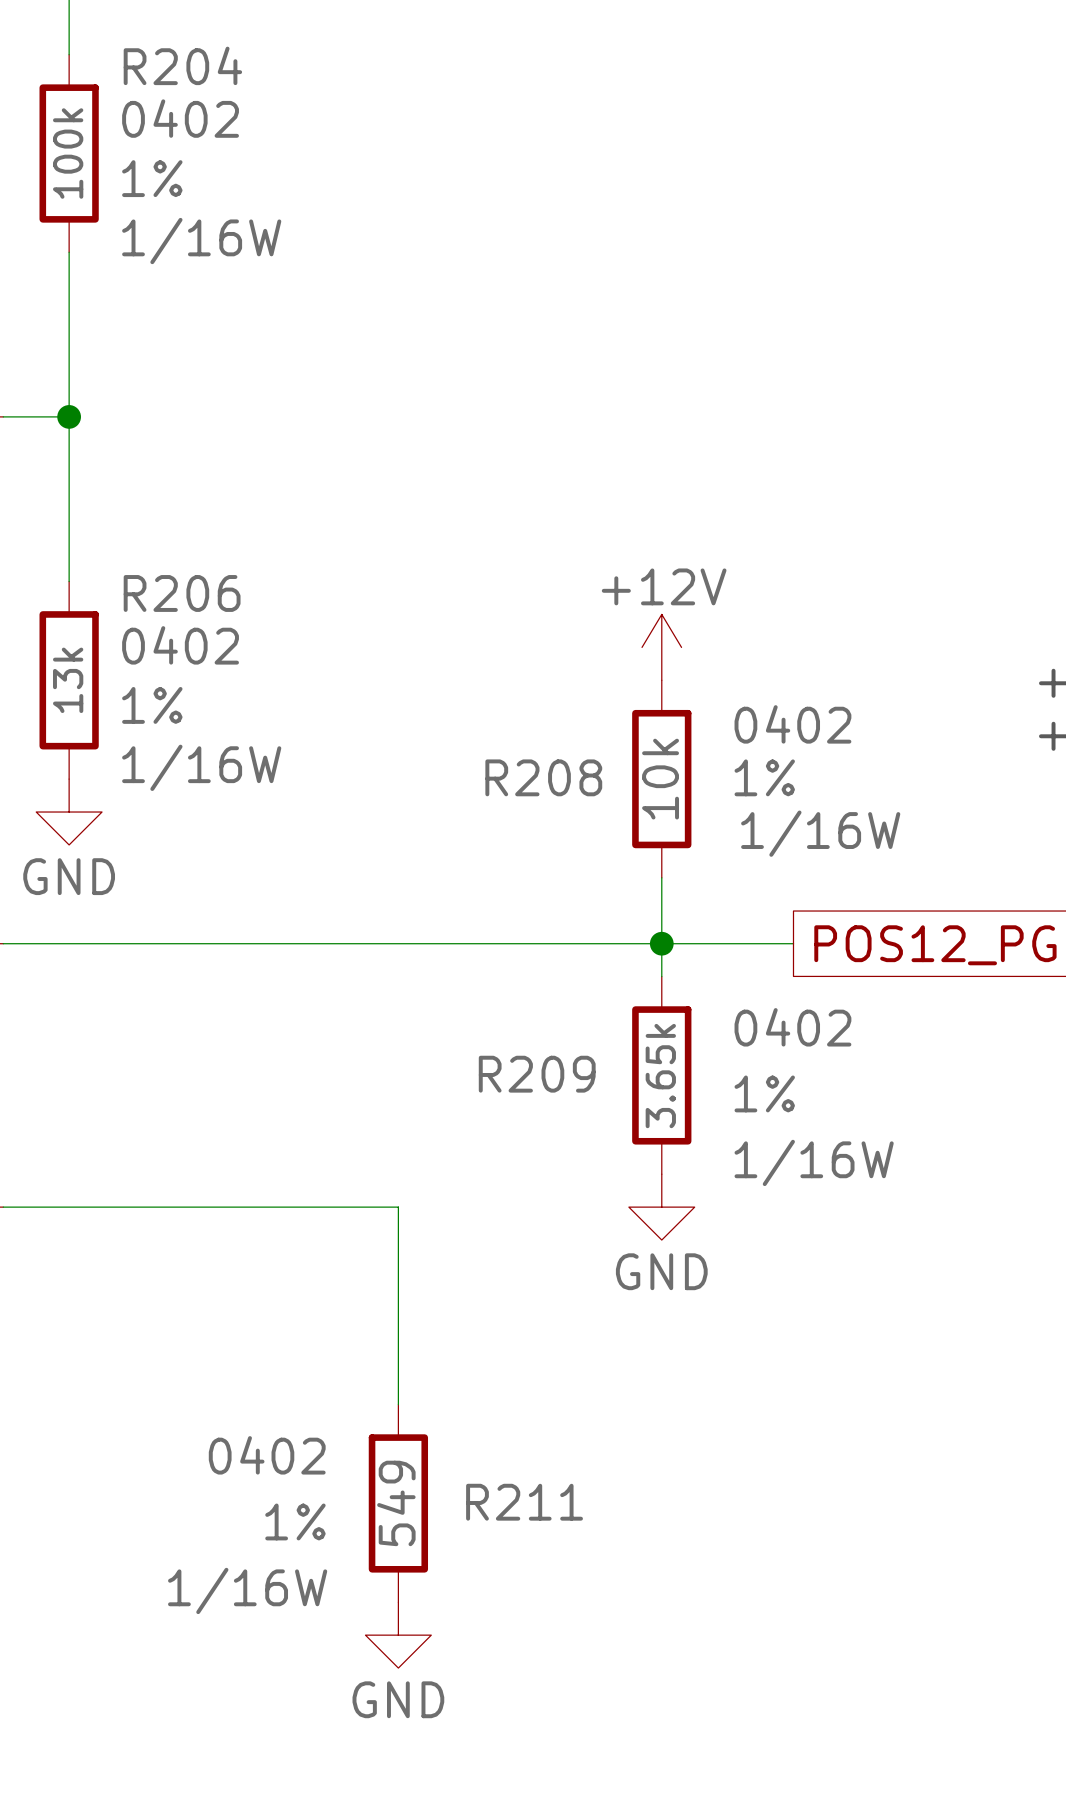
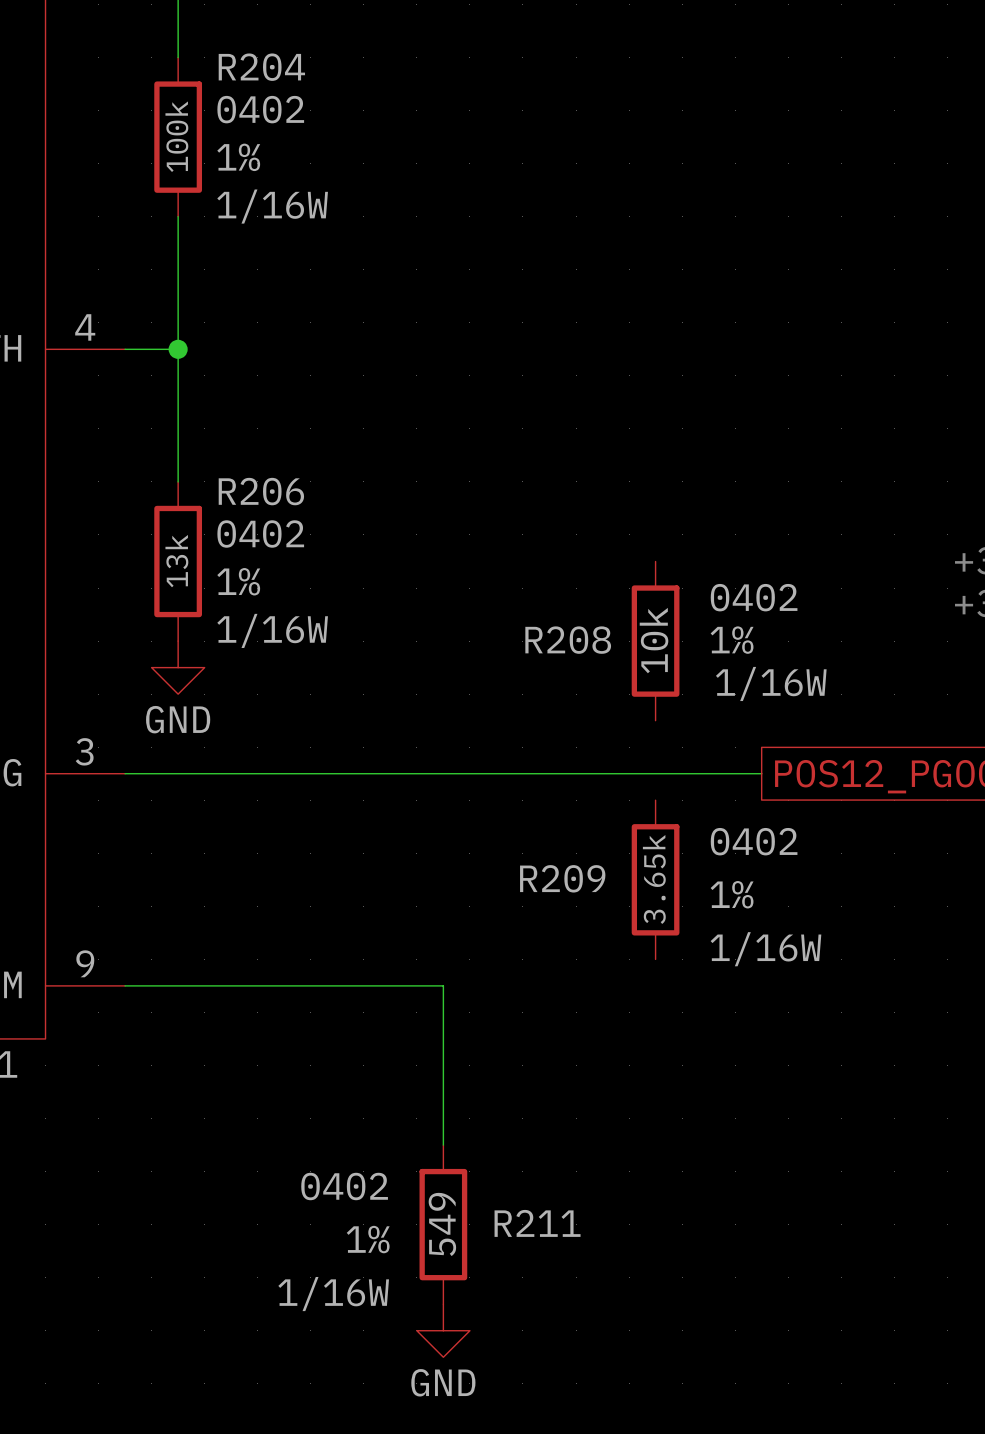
power symbol: +12V (661, 647) -> none
wire: (661, 877) (661, 976) -> none
junction: (661, 943) -> none
power symbol: GND (661, 1207) -> none

